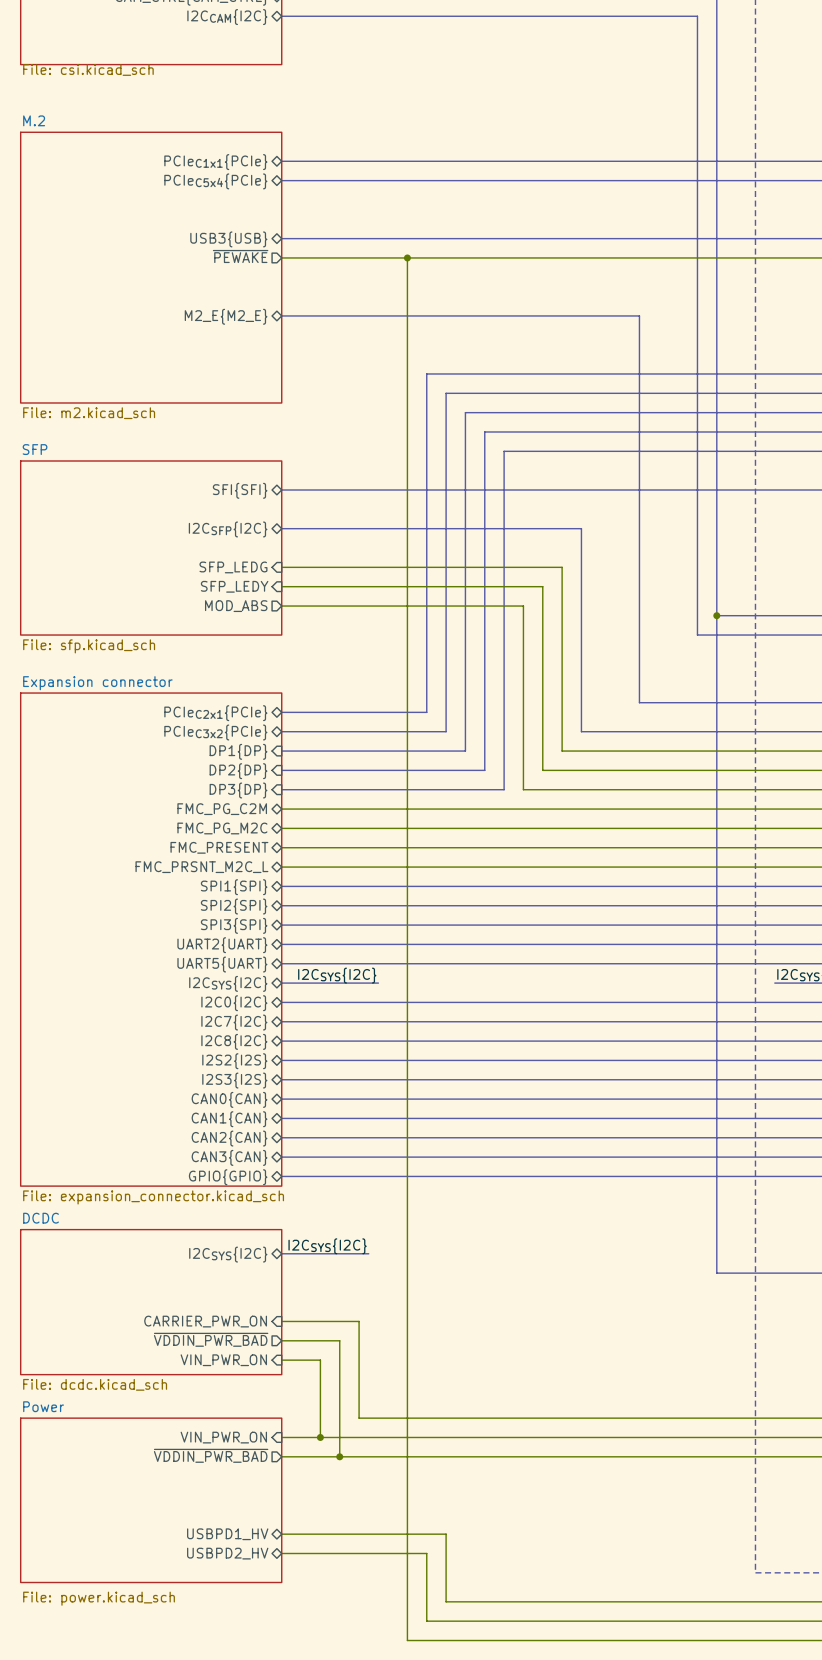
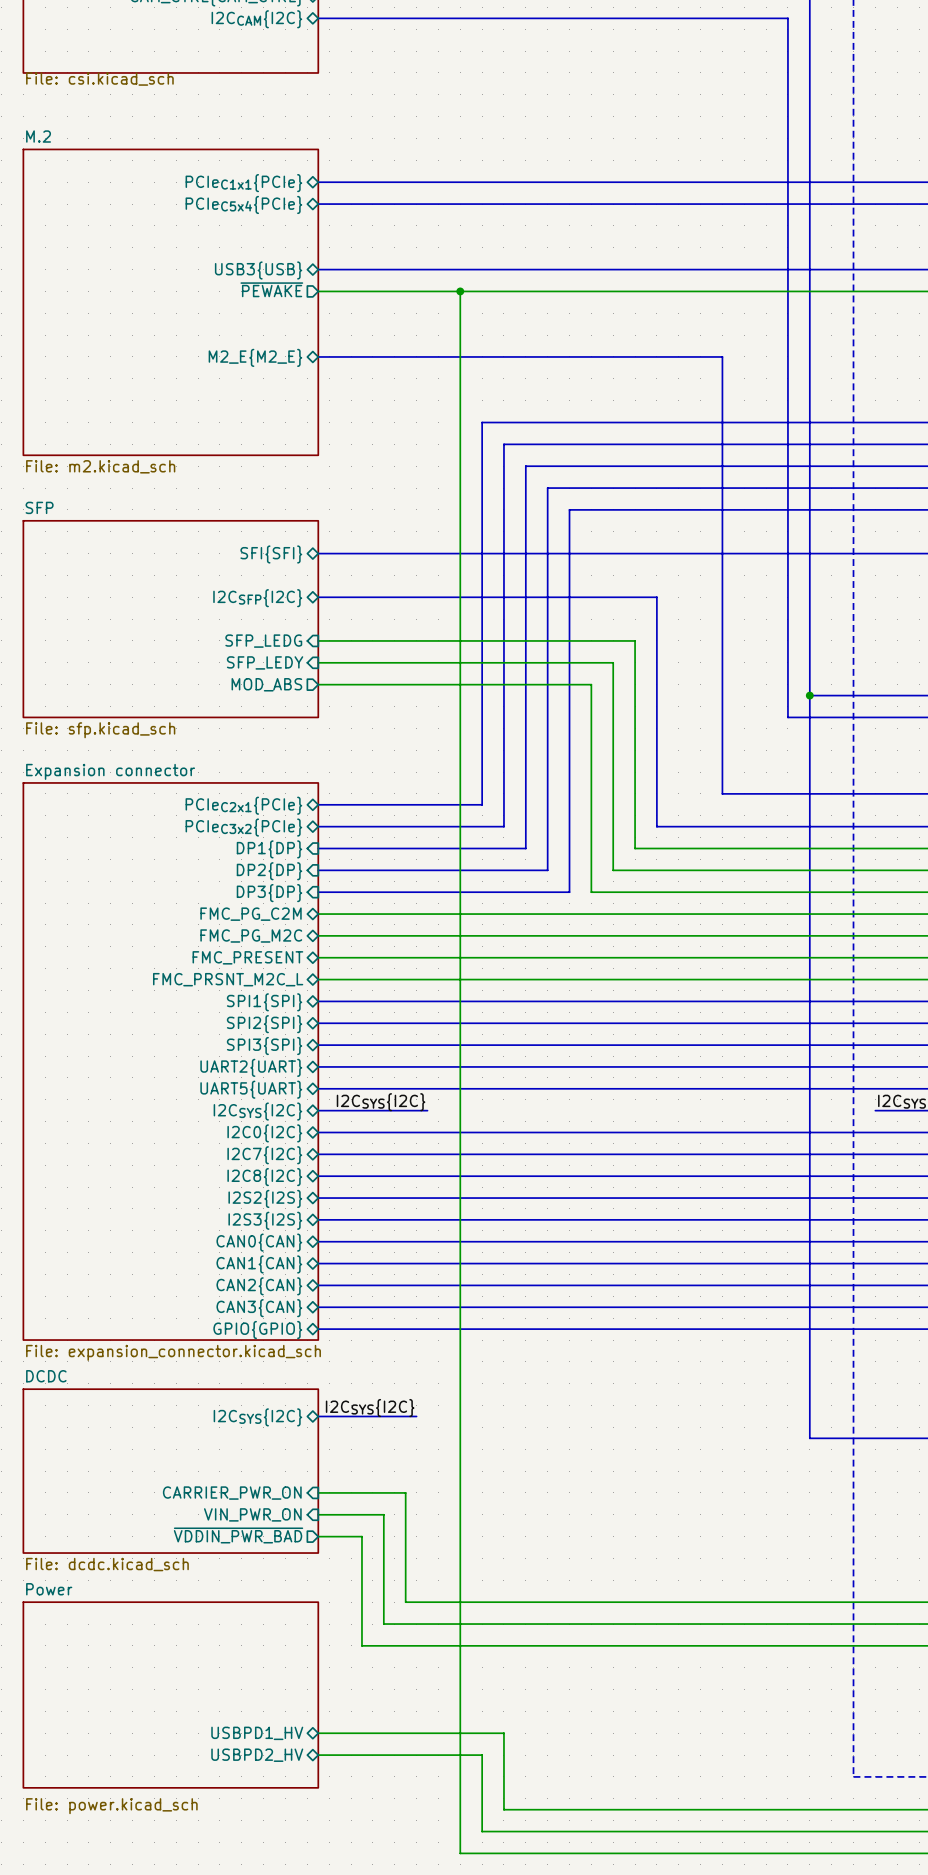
sheet pin shape: output (211, 1339) -> input (252, 1514)
sheet pin: ~{VDDIN_PWR_BAD} (211, 1339) -> VIN_PWR_ON (252, 1514)
sheet pin shape: input (223, 1360) -> output (238, 1535)
sheet pin: VIN_PWR_ON (223, 1360) -> ~{VDDIN_PWR_BAD} (238, 1535)
sheet pin: VIN_PWR_ON (223, 1437) -> none
wire: (281, 1437) (339, 1437) (339, 1456) -> none
junction: (320, 1437) -> none
sheet pin: ~{VDDIN_PWR_BAD} (211, 1455) -> none
wire: (281, 1456) (320, 1456) -> (361, 1624) (361, 1645)
junction: (339, 1456) -> none

